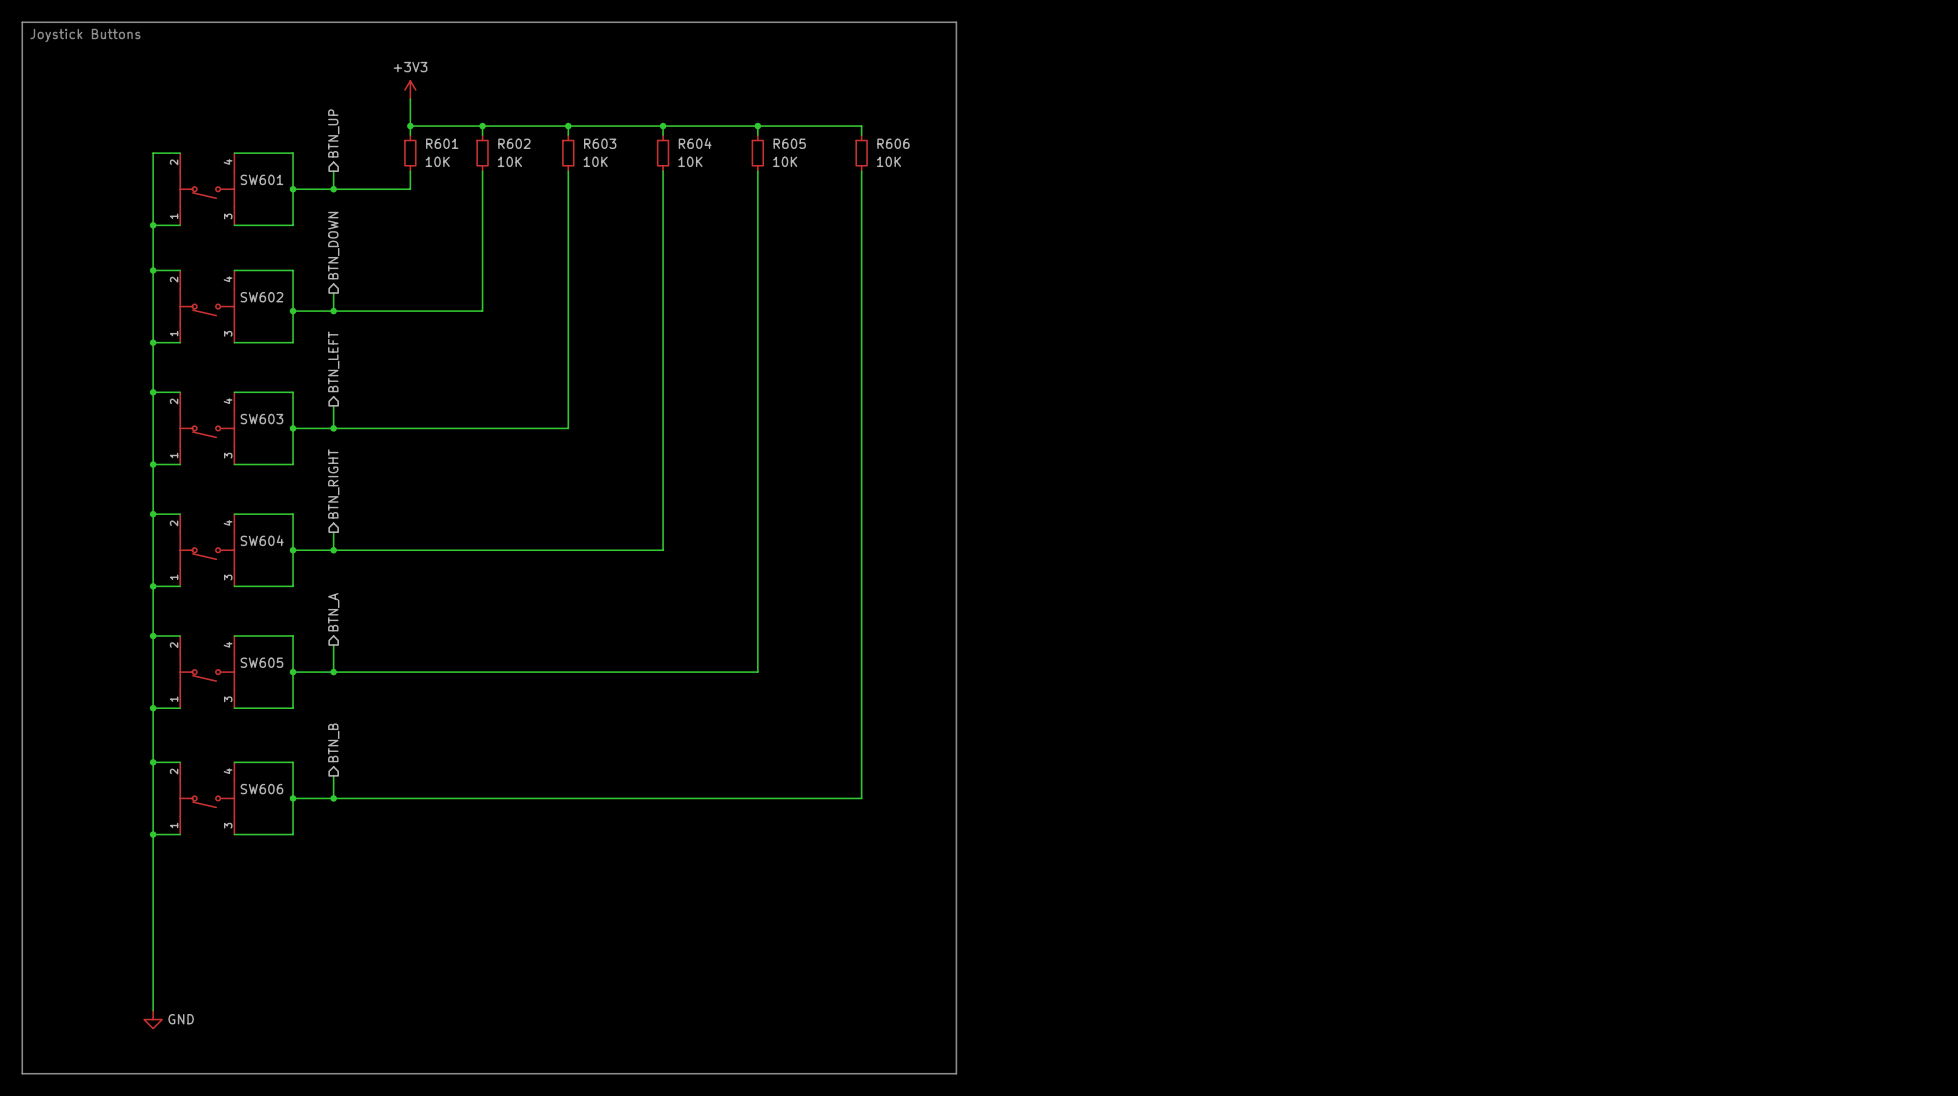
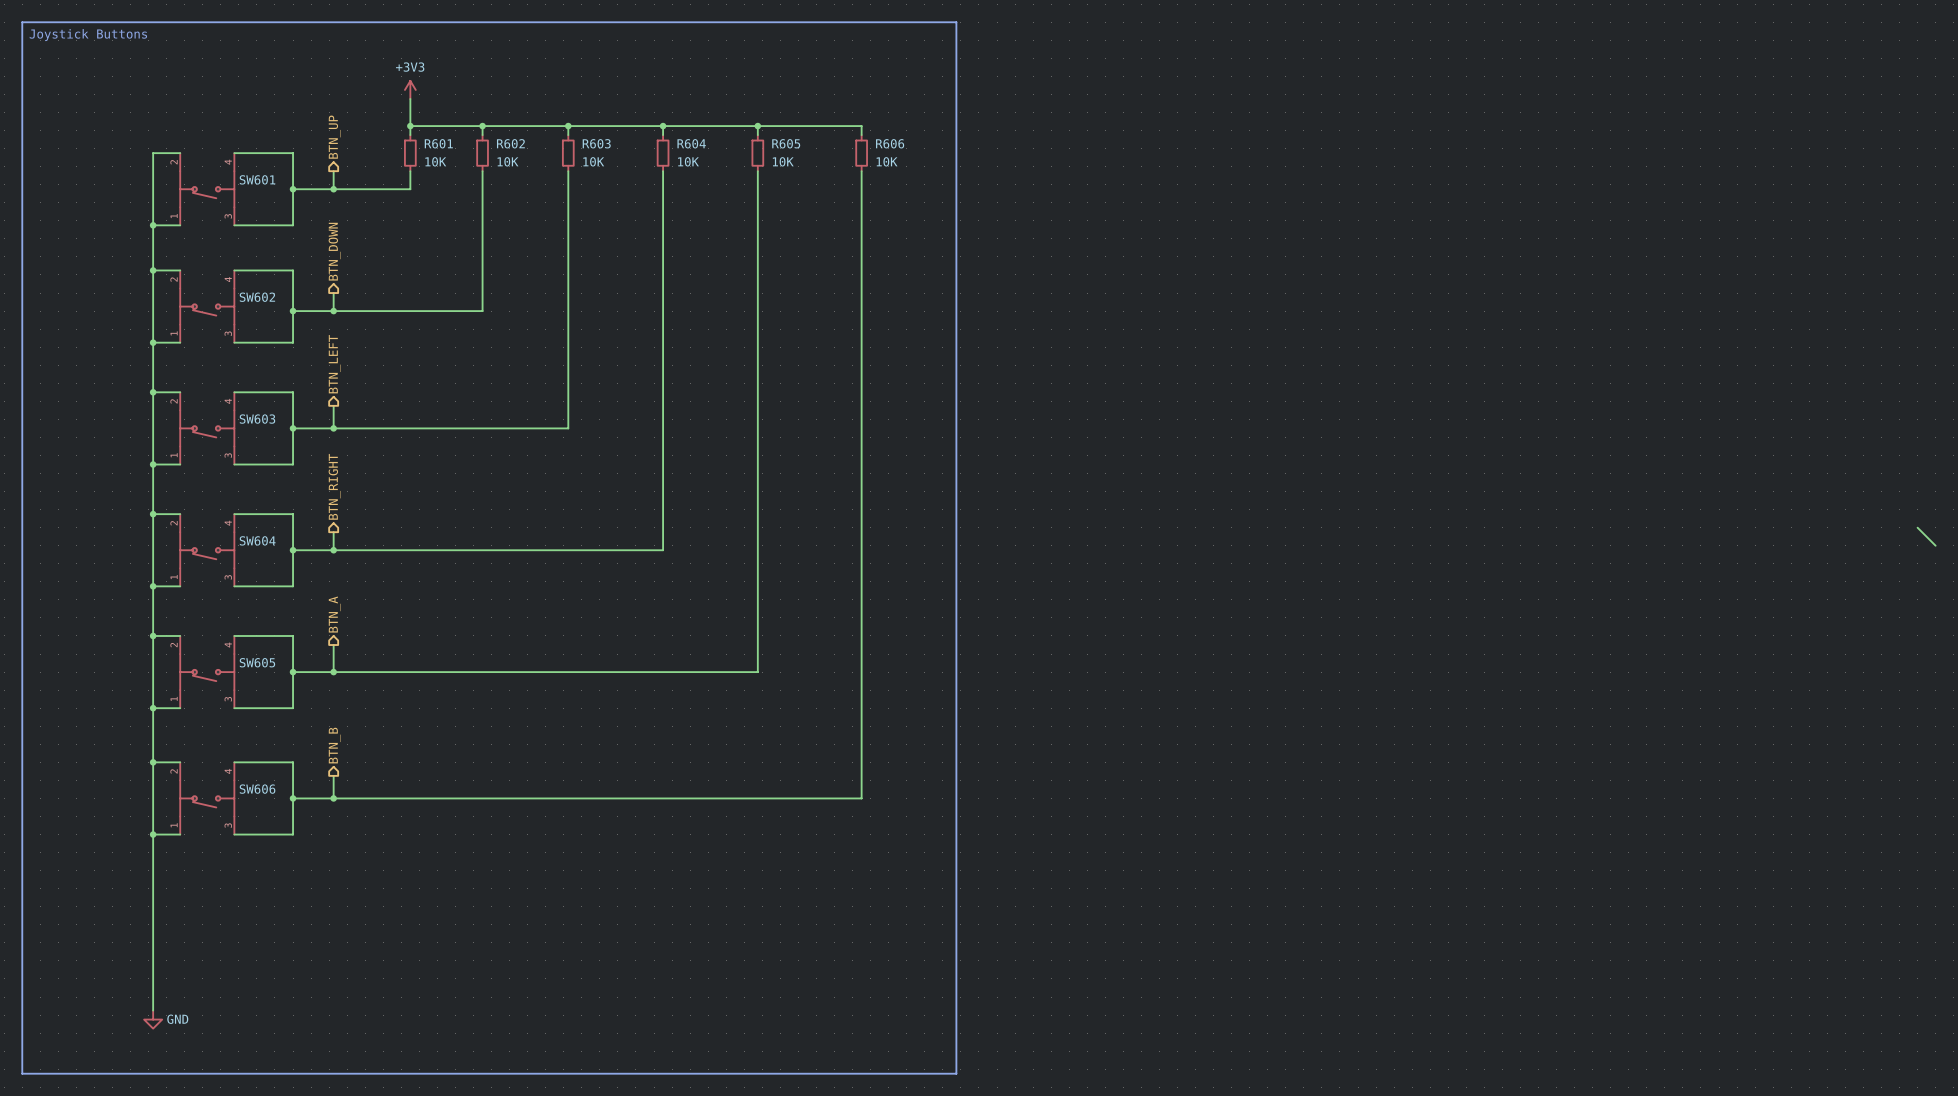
wire: none -> (1917, 527) (1935, 545)

